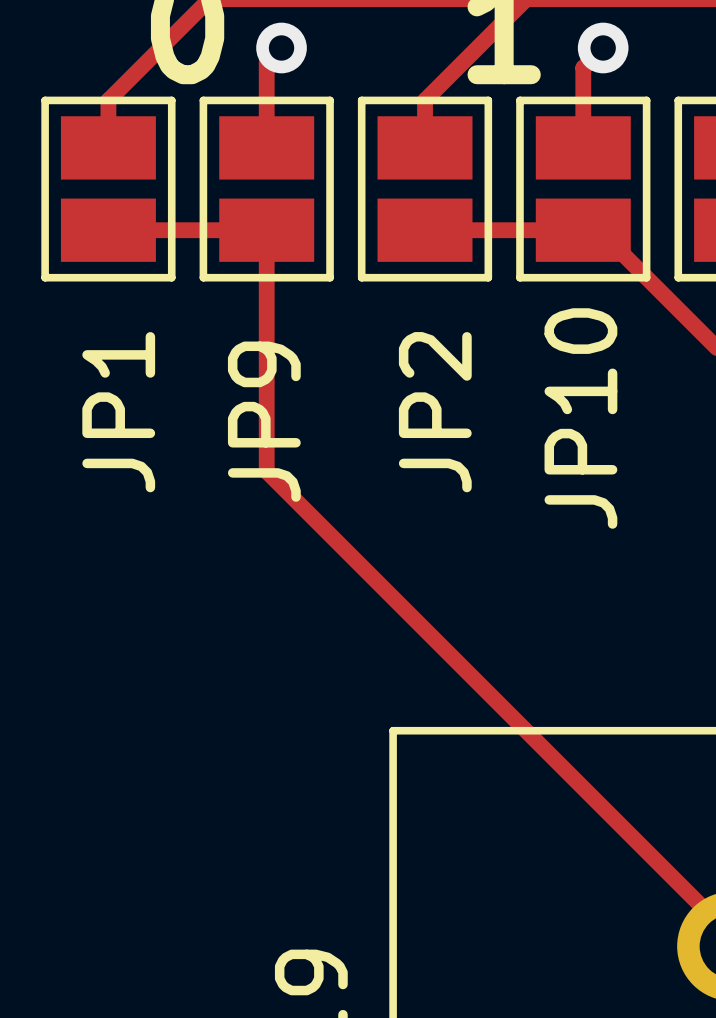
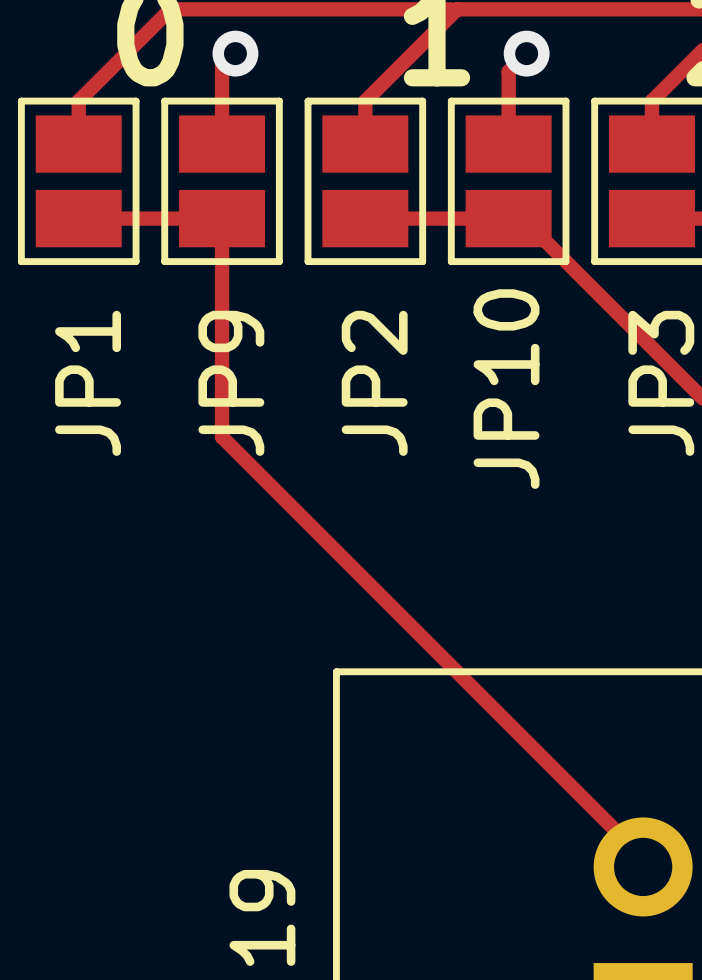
JP9 name position: JP9 (264, 421) -> JP9 (231, 383)

